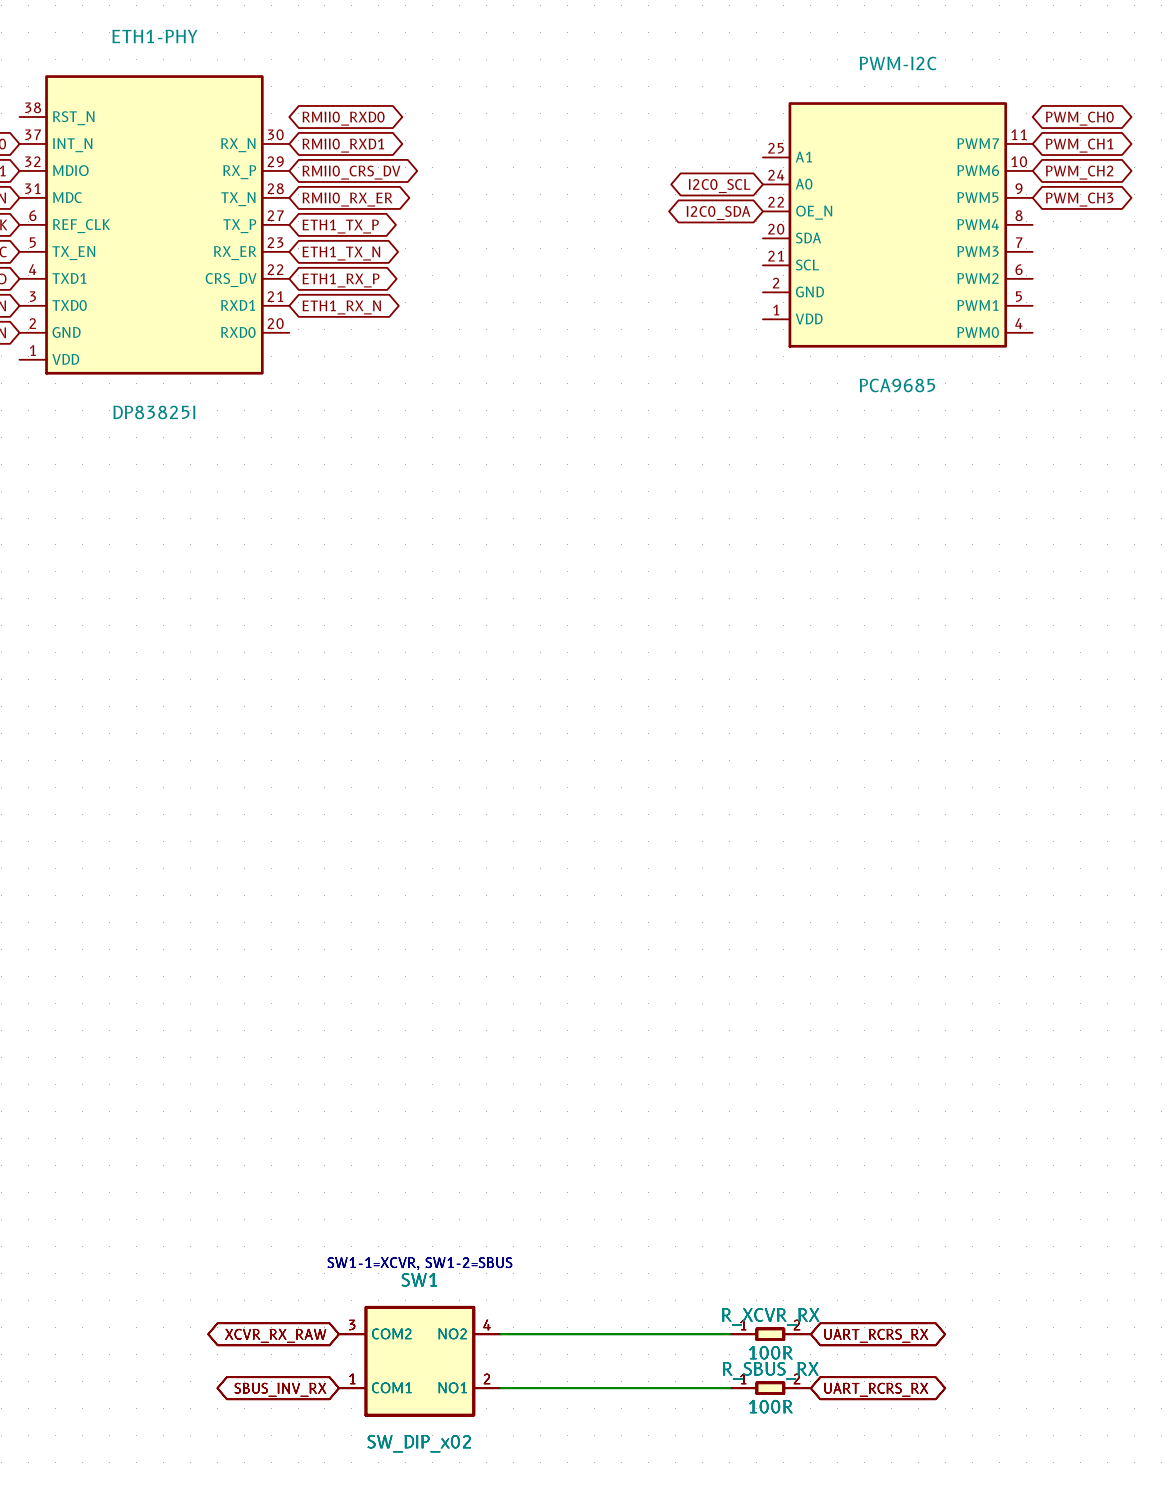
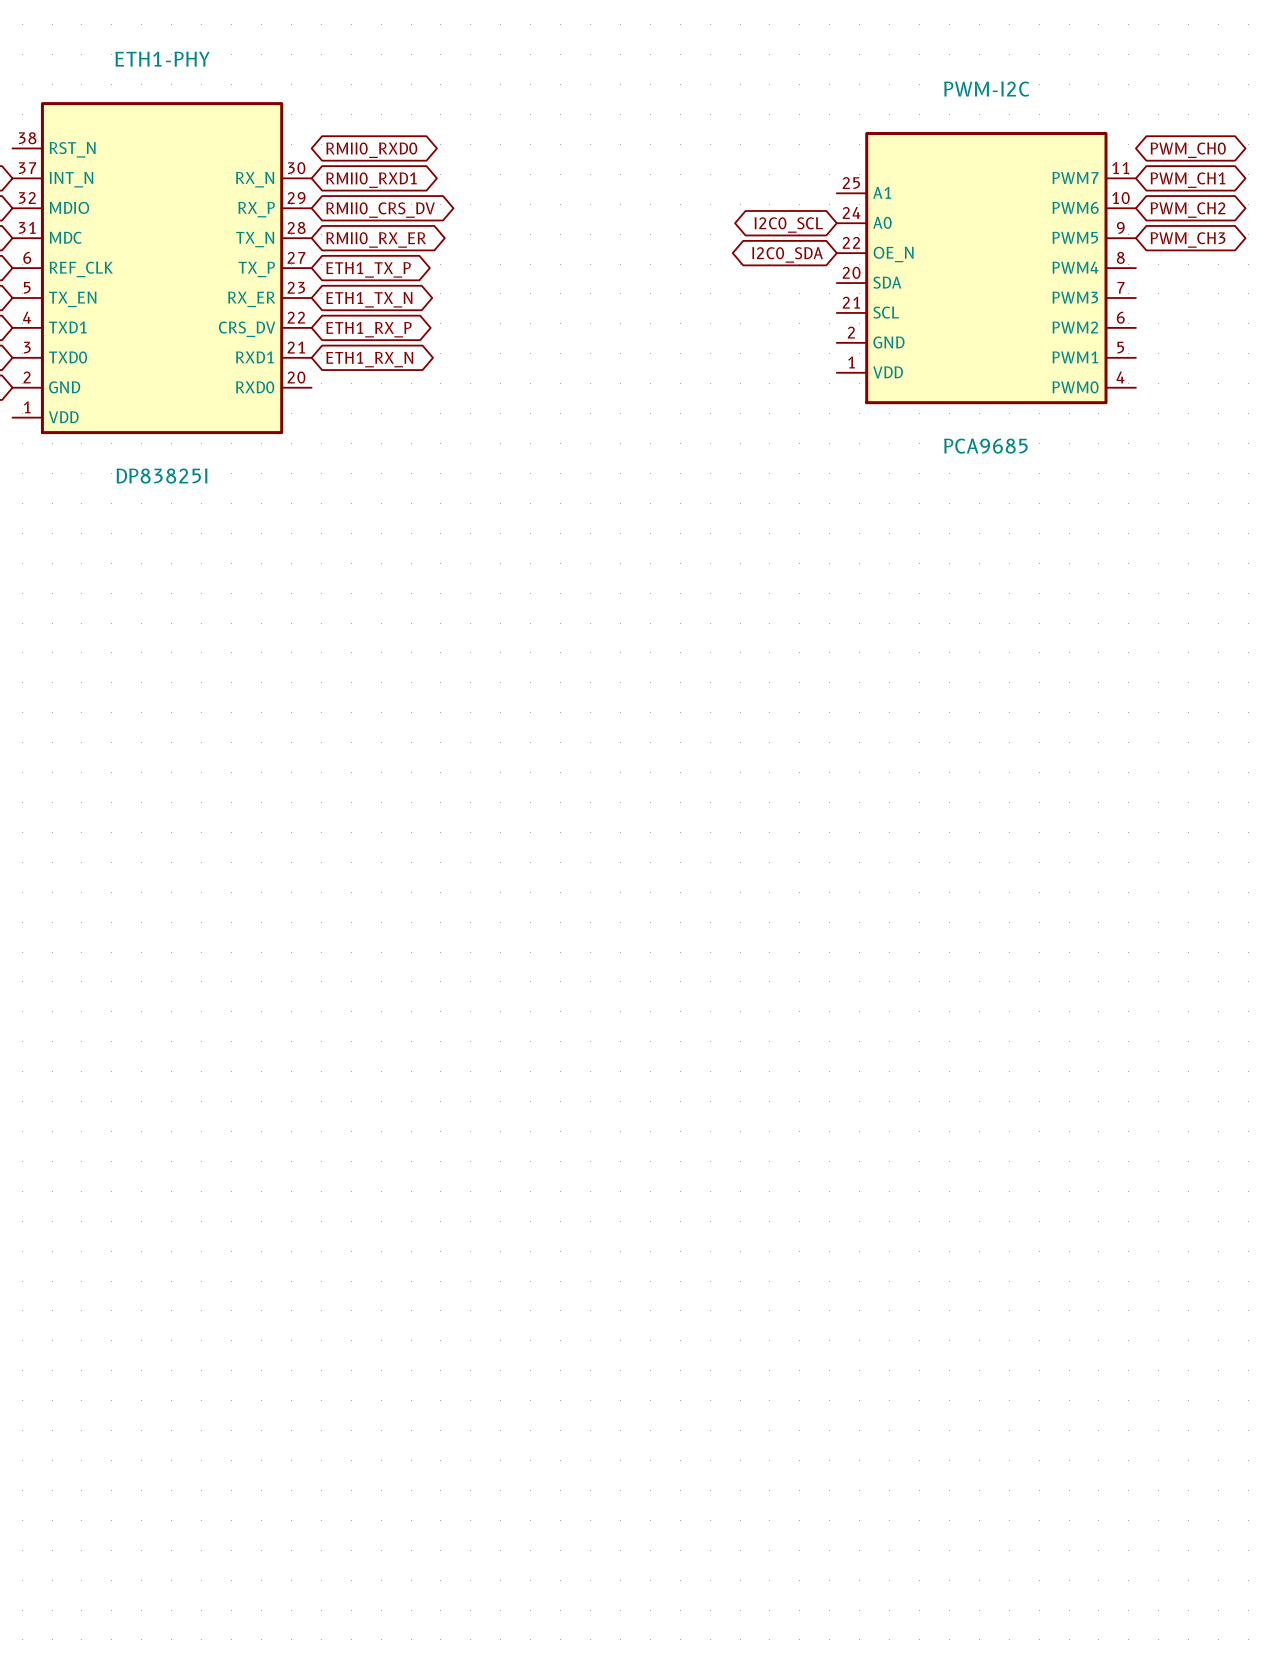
text: SW1-1=XCVR, SW1-2=SBUS (419, 1263) -> none
wire: (500, 1334) (729, 1334) -> none
R_XCVR_RX: 100R (770, 1334) -> none
global label: XCVR_RX_RAW (275, 1335) -> none
global label: UART_RCRS_RX (876, 1335) -> none
SW1: SW_DIP_x02 (419, 1361) -> none
wire: (500, 1388) (729, 1388) -> none
R_SBUS_RX: 100R (770, 1388) -> none
global label: SBUS_INV_RX (280, 1389) -> none
global label: UART_RCRS_RX (876, 1389) -> none

